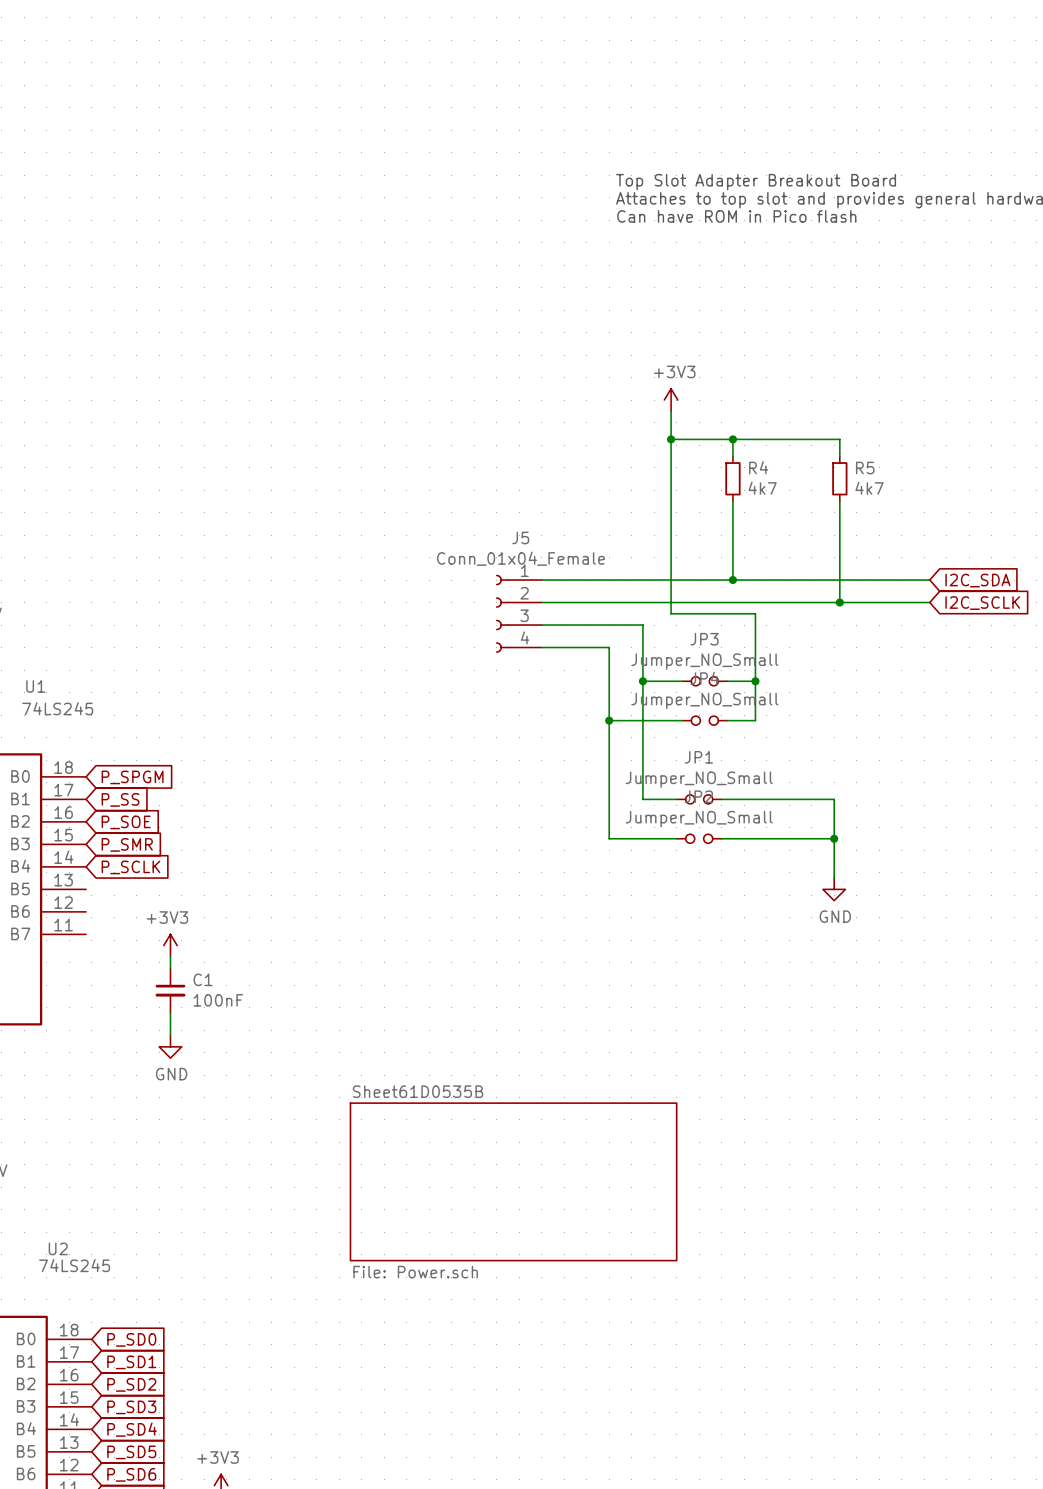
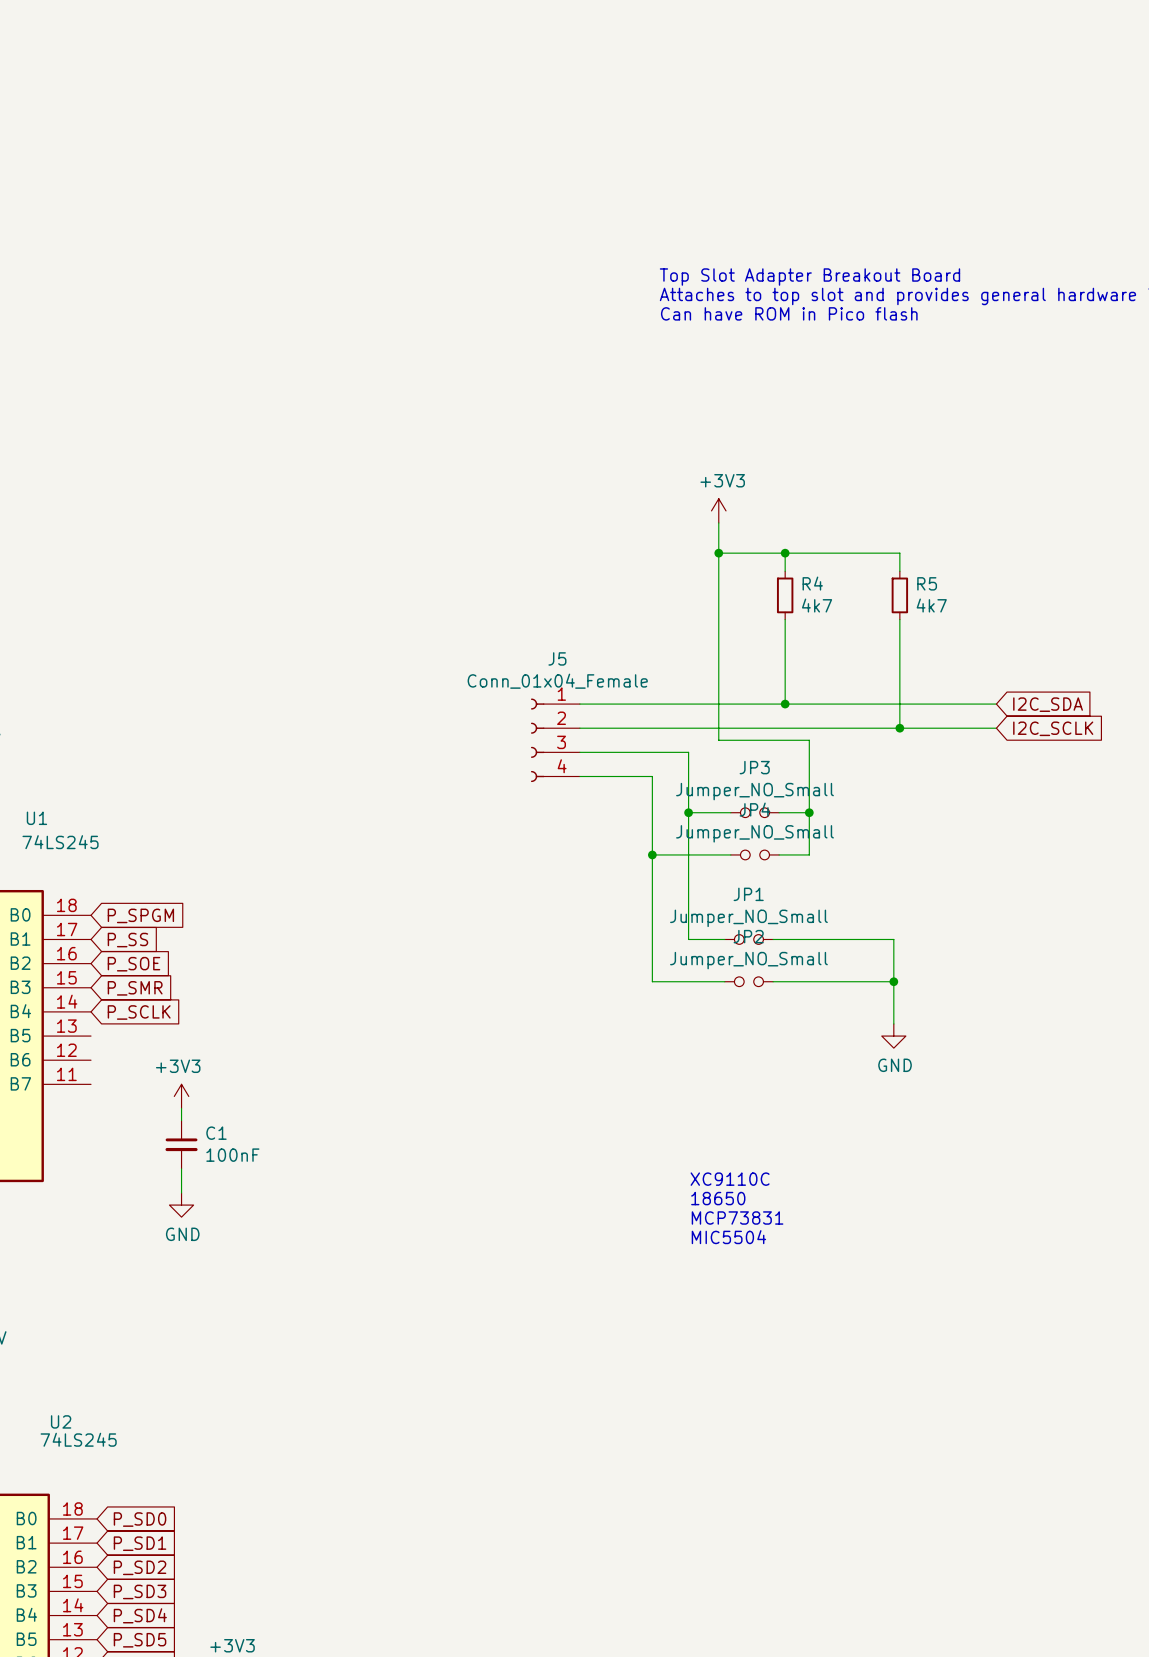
text: none -> XC9110C (730, 1179)
text: none -> 18650 (718, 1198)
text: none -> MCP73831 (737, 1218)
text: none -> MIC5504 (728, 1237)
sheet Sheet61D0535B: File: Power.sch (513, 1181) -> none

